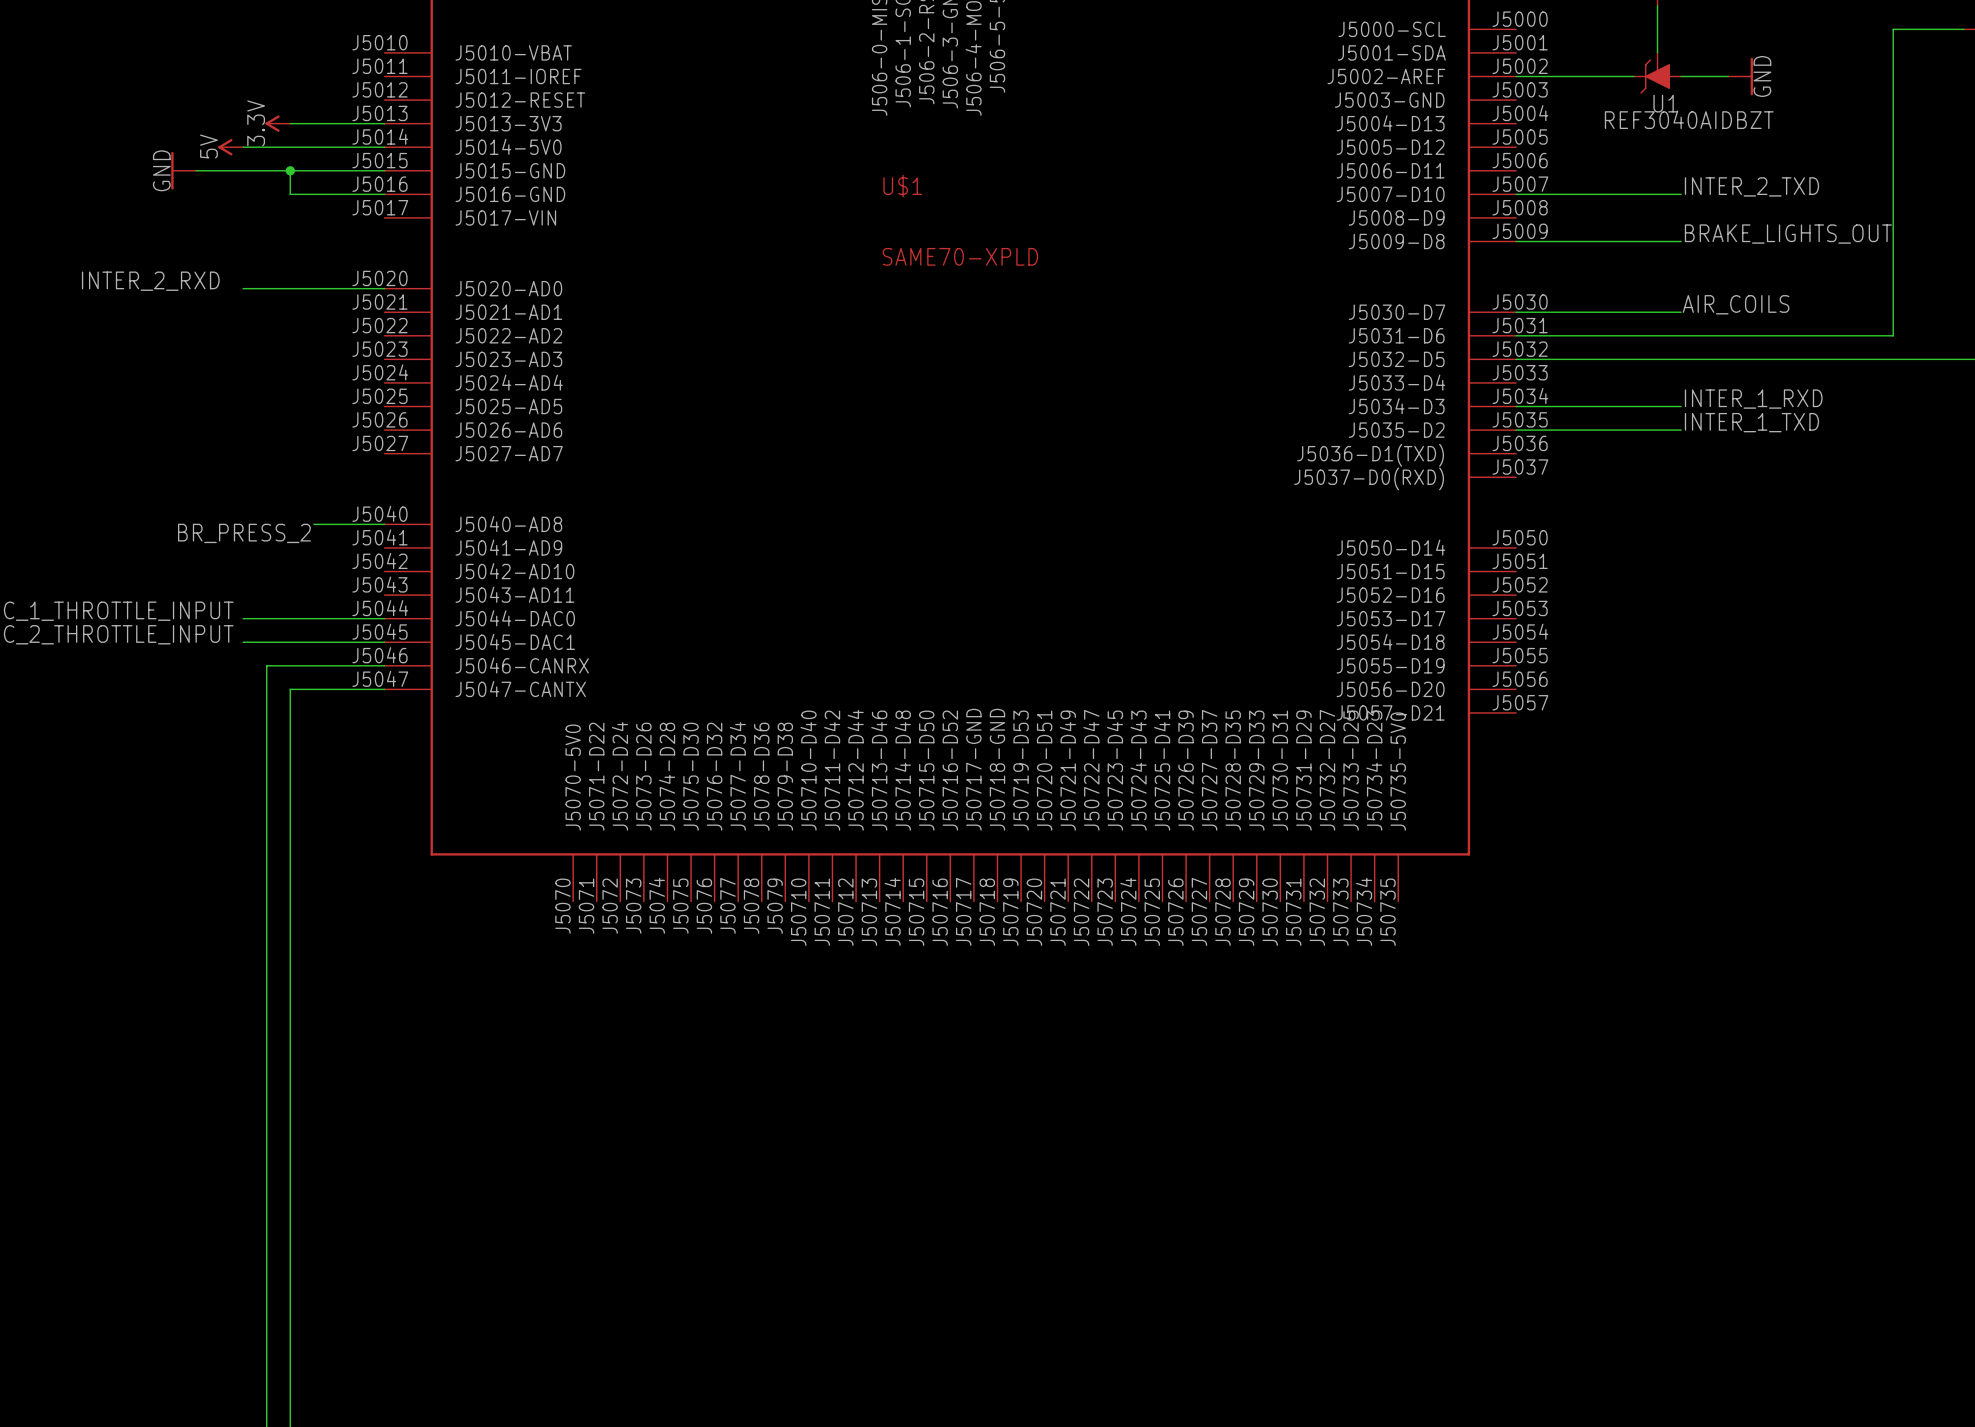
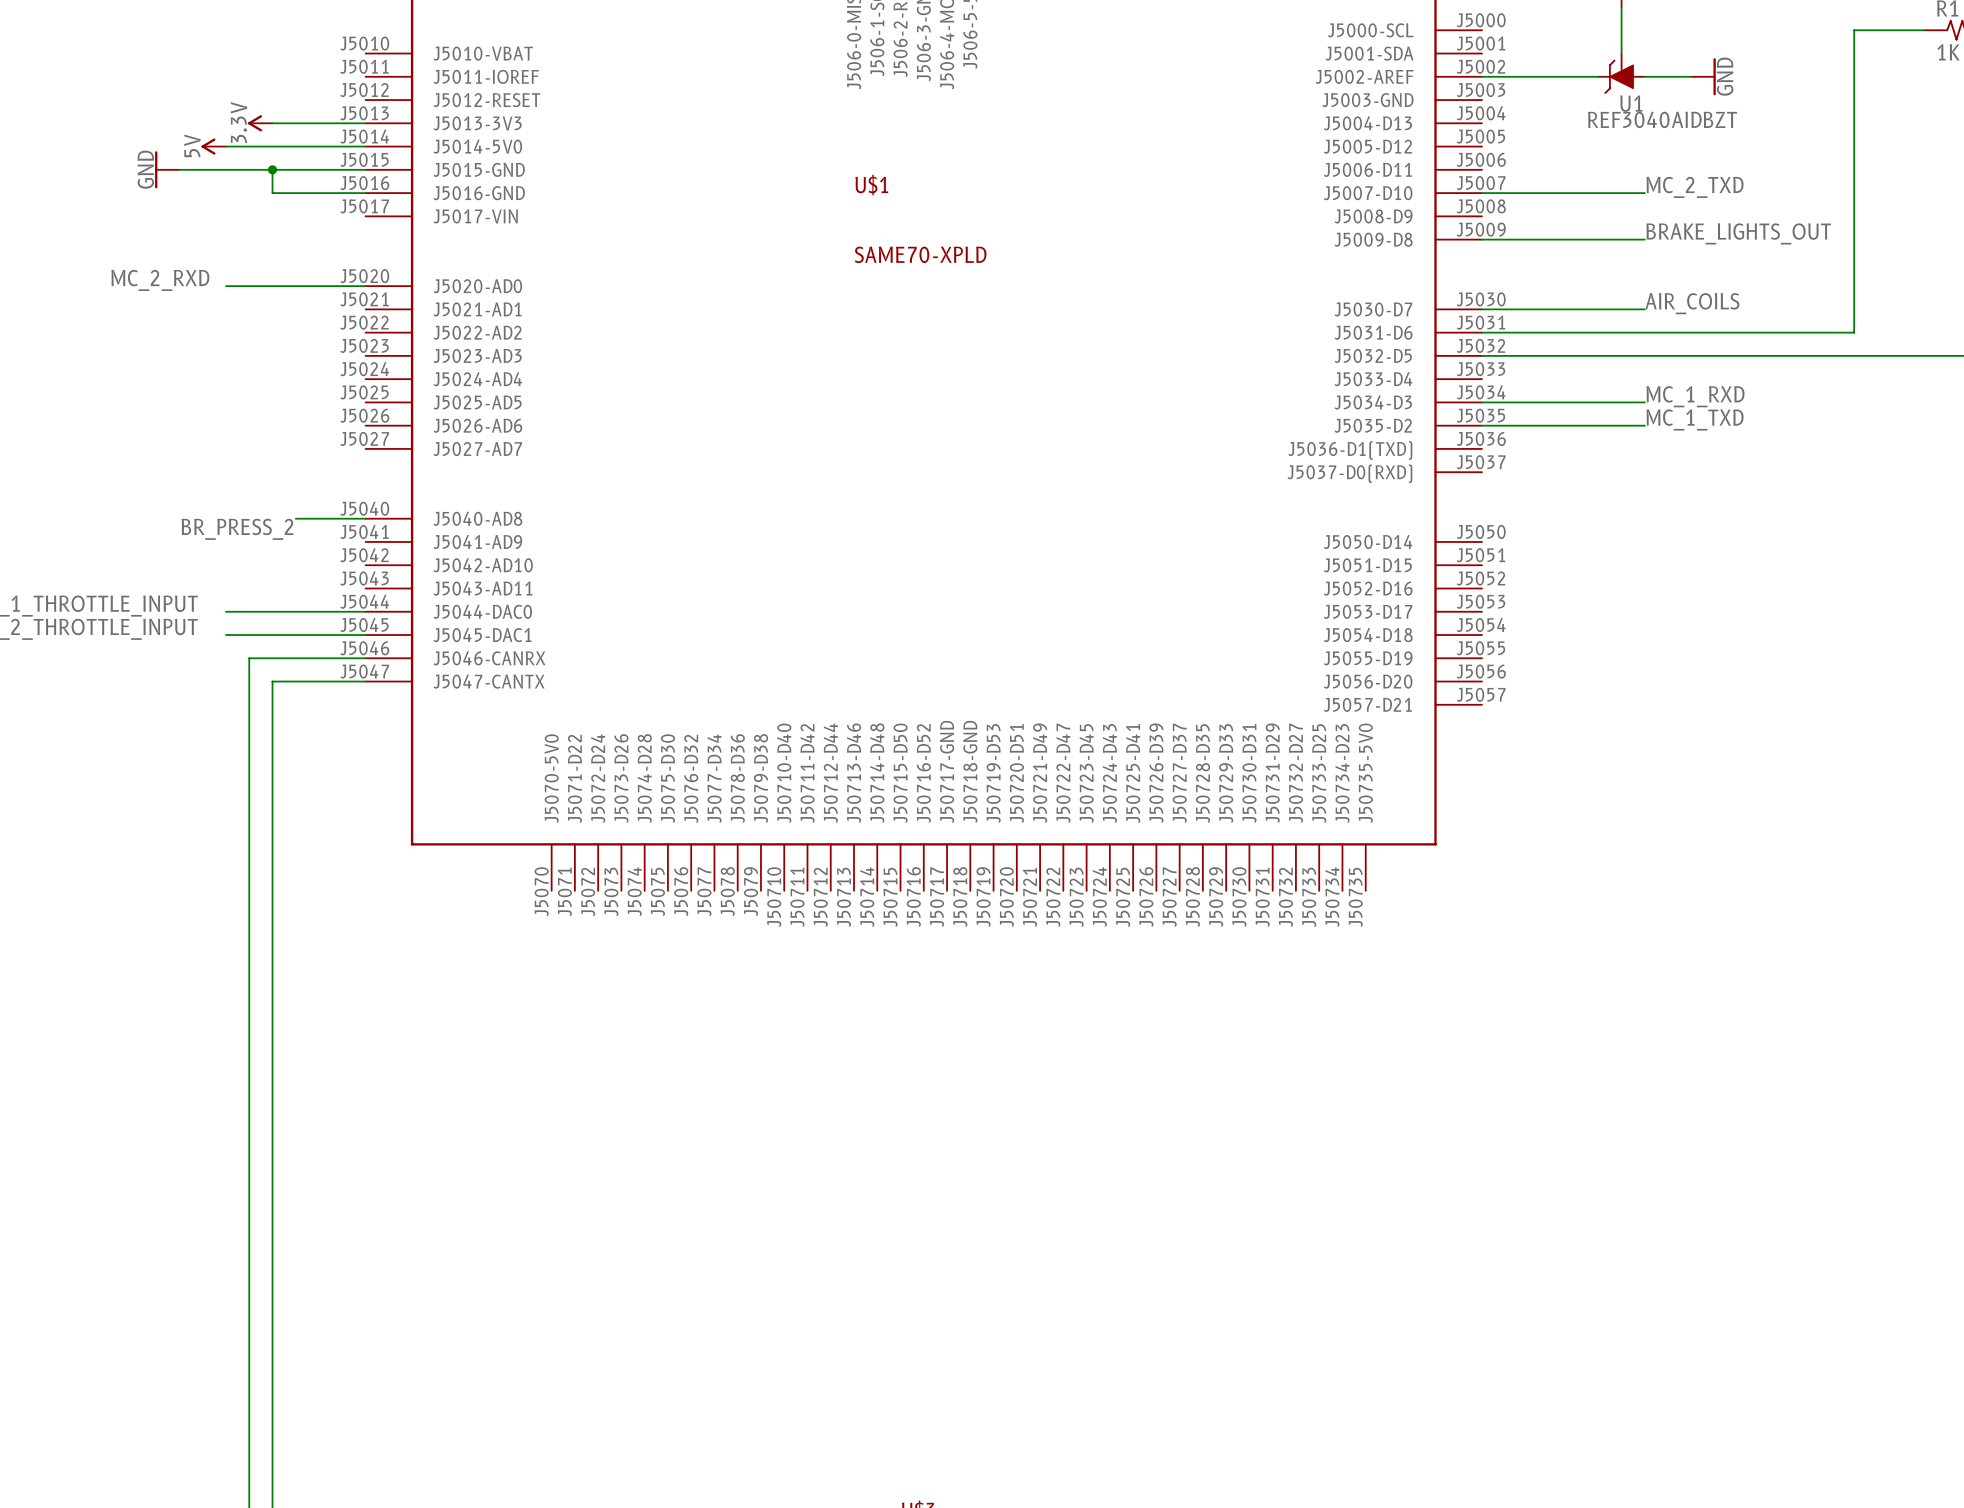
label: INTER_2_TXD (1751, 186) -> MC_2_TXD (1695, 187)
label: INTER_2_RXD (150, 281) -> MC_2_RXD (160, 280)
label: INTER_1_RXD (1753, 399) -> MC_1_RXD (1695, 396)
label: INTER_1_TXD (1751, 422) -> MC_1_TXD (1695, 419)

